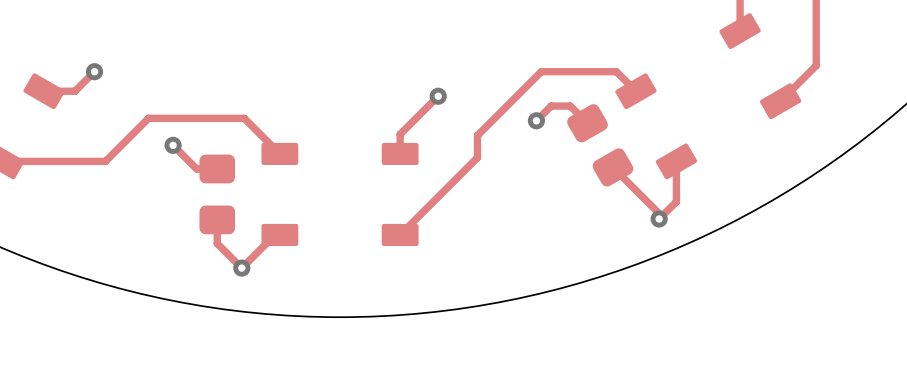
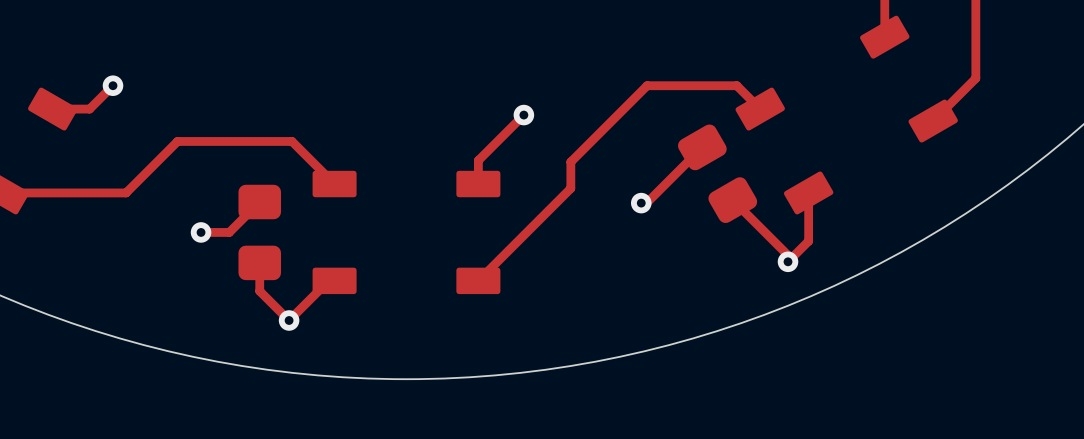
top track: (536, 120) (551, 106) (570, 106) (587, 123) -> (641, 203) (646, 203) (702, 147)
via position: (536, 120) -> (641, 203)
top track: (173, 145) (196, 168) (217, 168) -> (201, 232) (229, 232) (259, 202)
via position: (173, 145) -> (201, 232)

